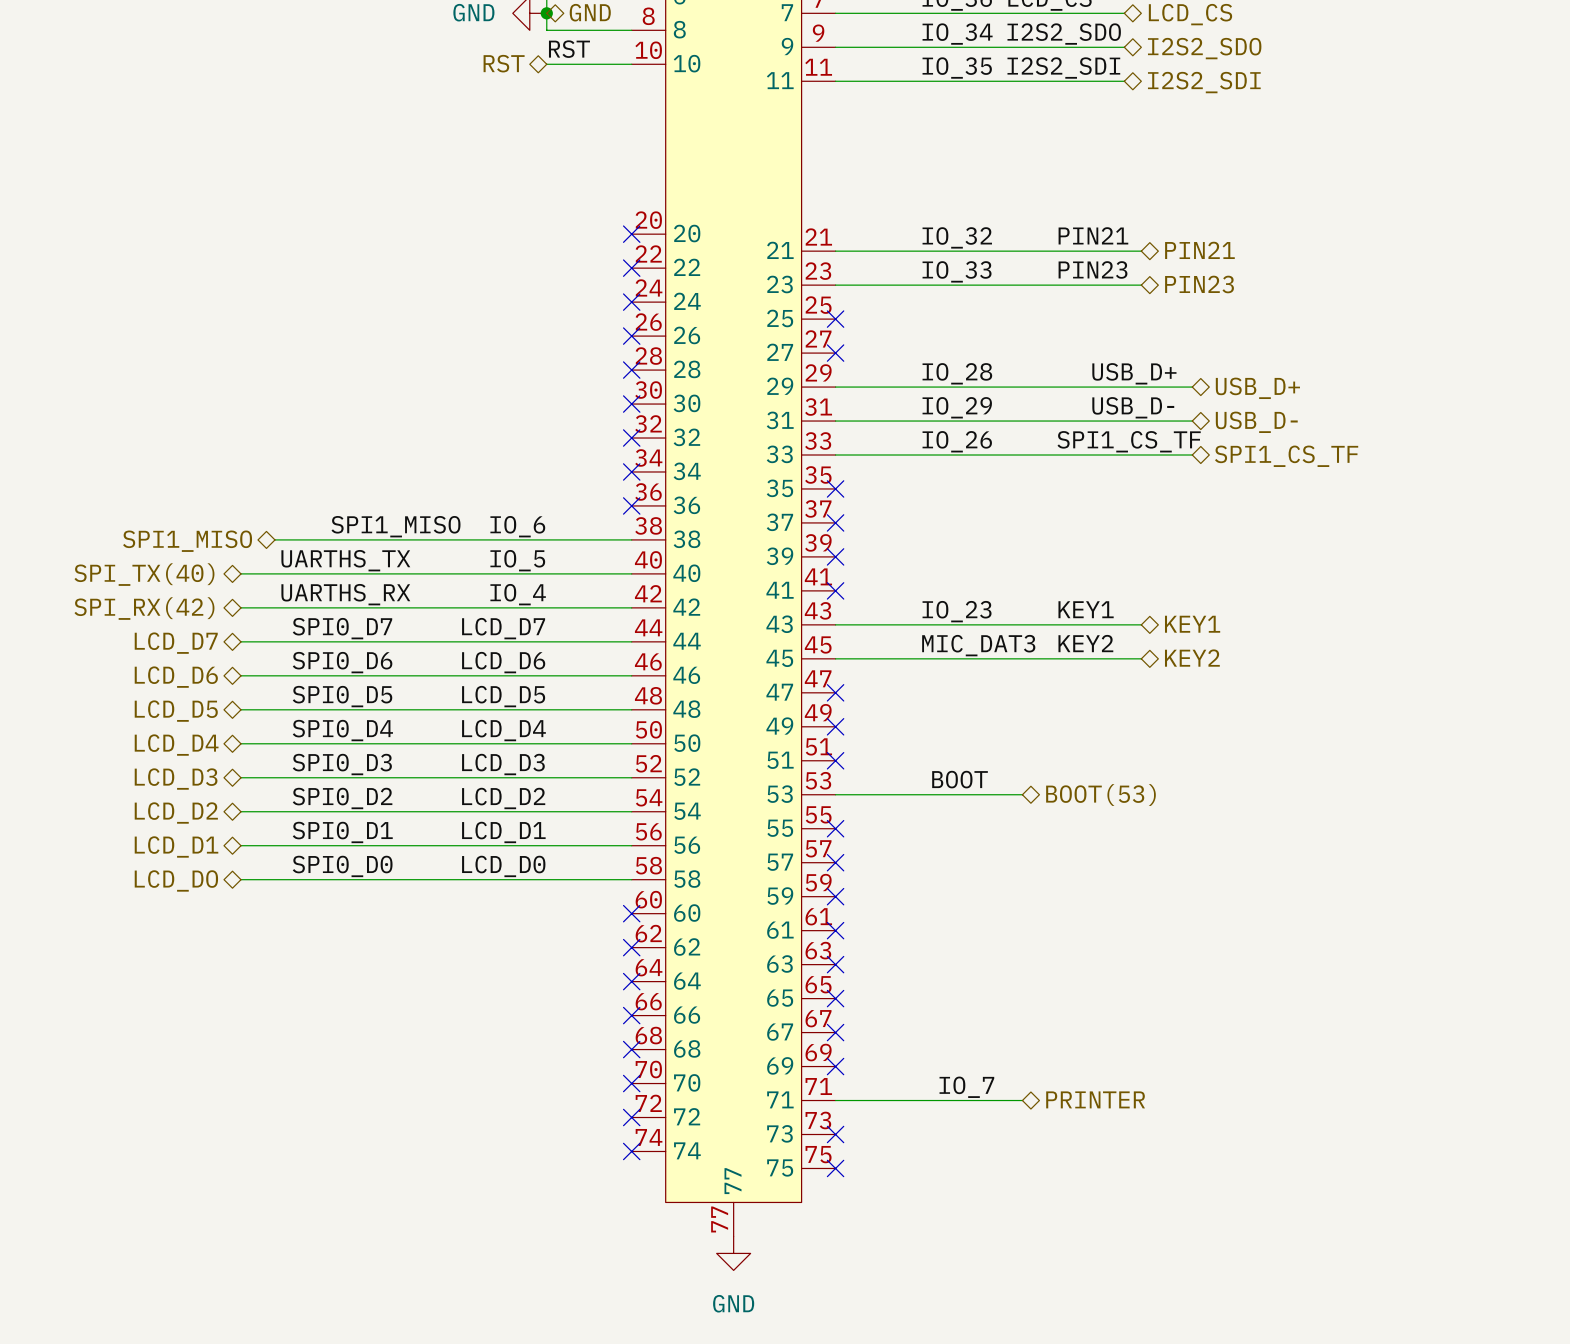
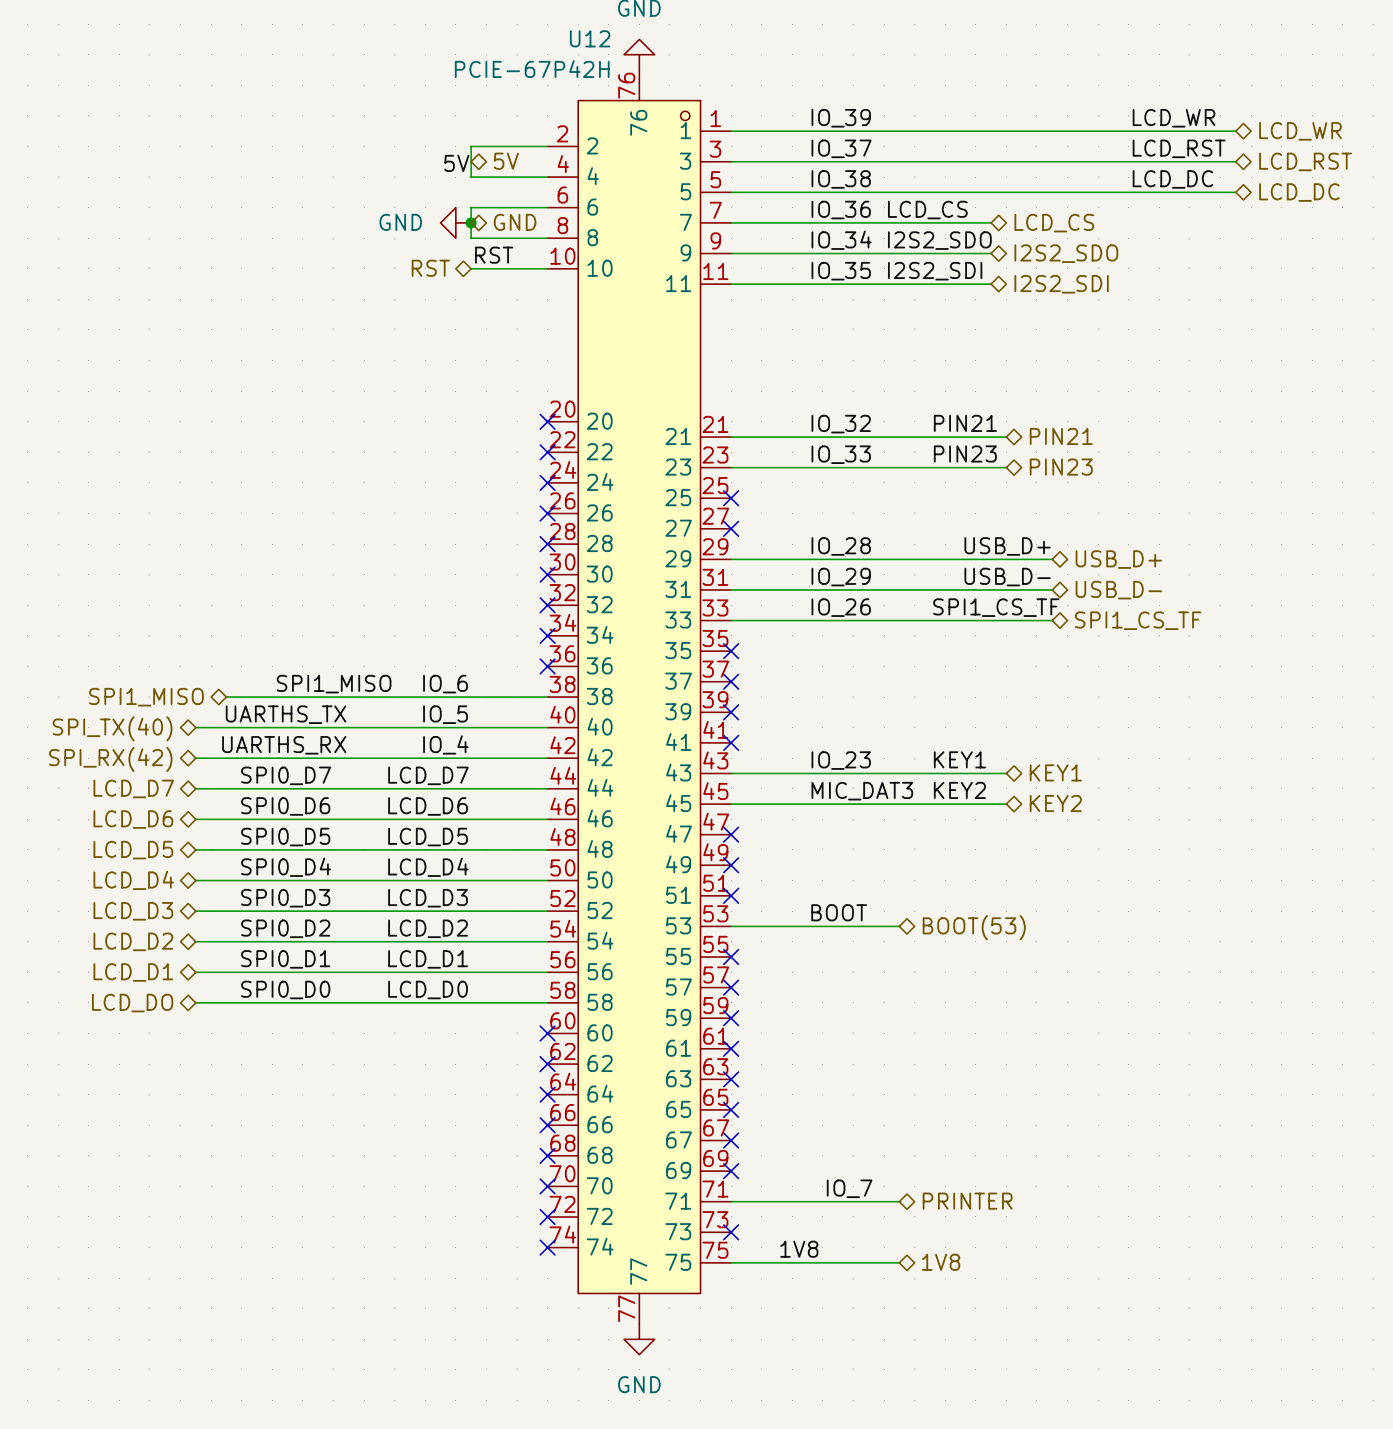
label: none -> 1V8 (799, 1249)
hierarchical label: none -> 1V8 (941, 1262)
wire: none -> (731, 1262) (899, 1262)
no-connect mark: (835, 1168) -> none

